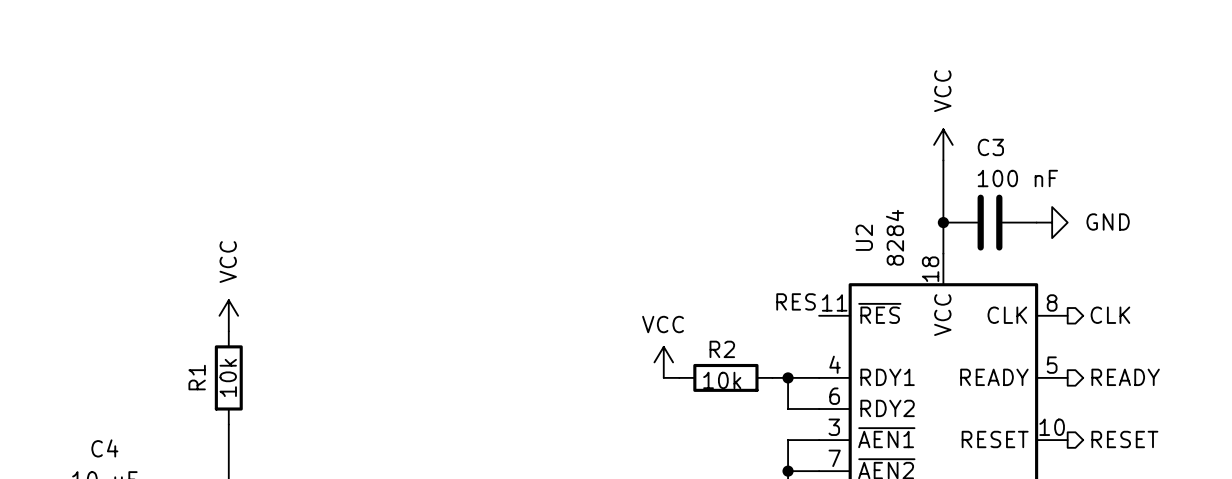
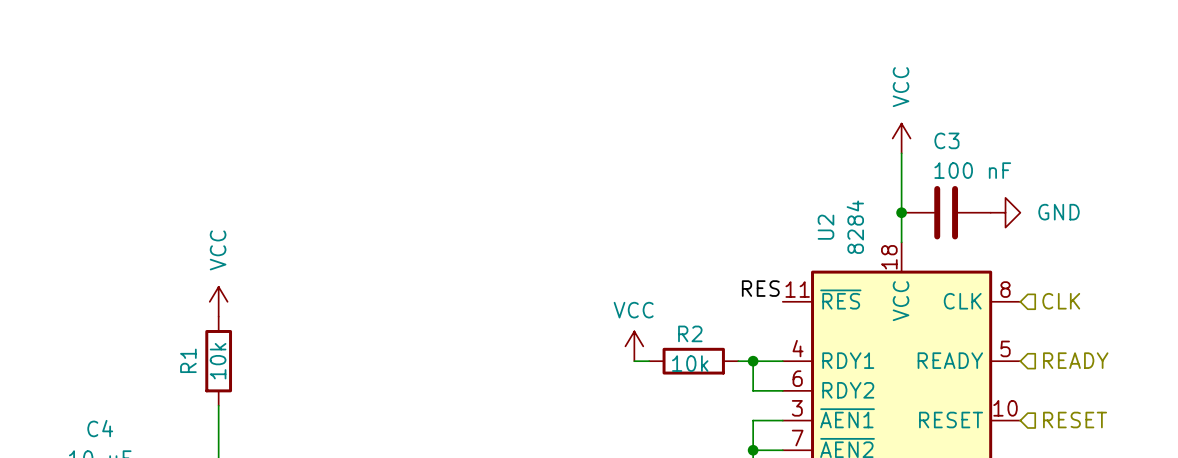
hierarchical label shape: output (1110, 315) -> input (1061, 301)
hierarchical label shape: output (1125, 377) -> input (1075, 360)
hierarchical label shape: output (1124, 439) -> input (1075, 420)

